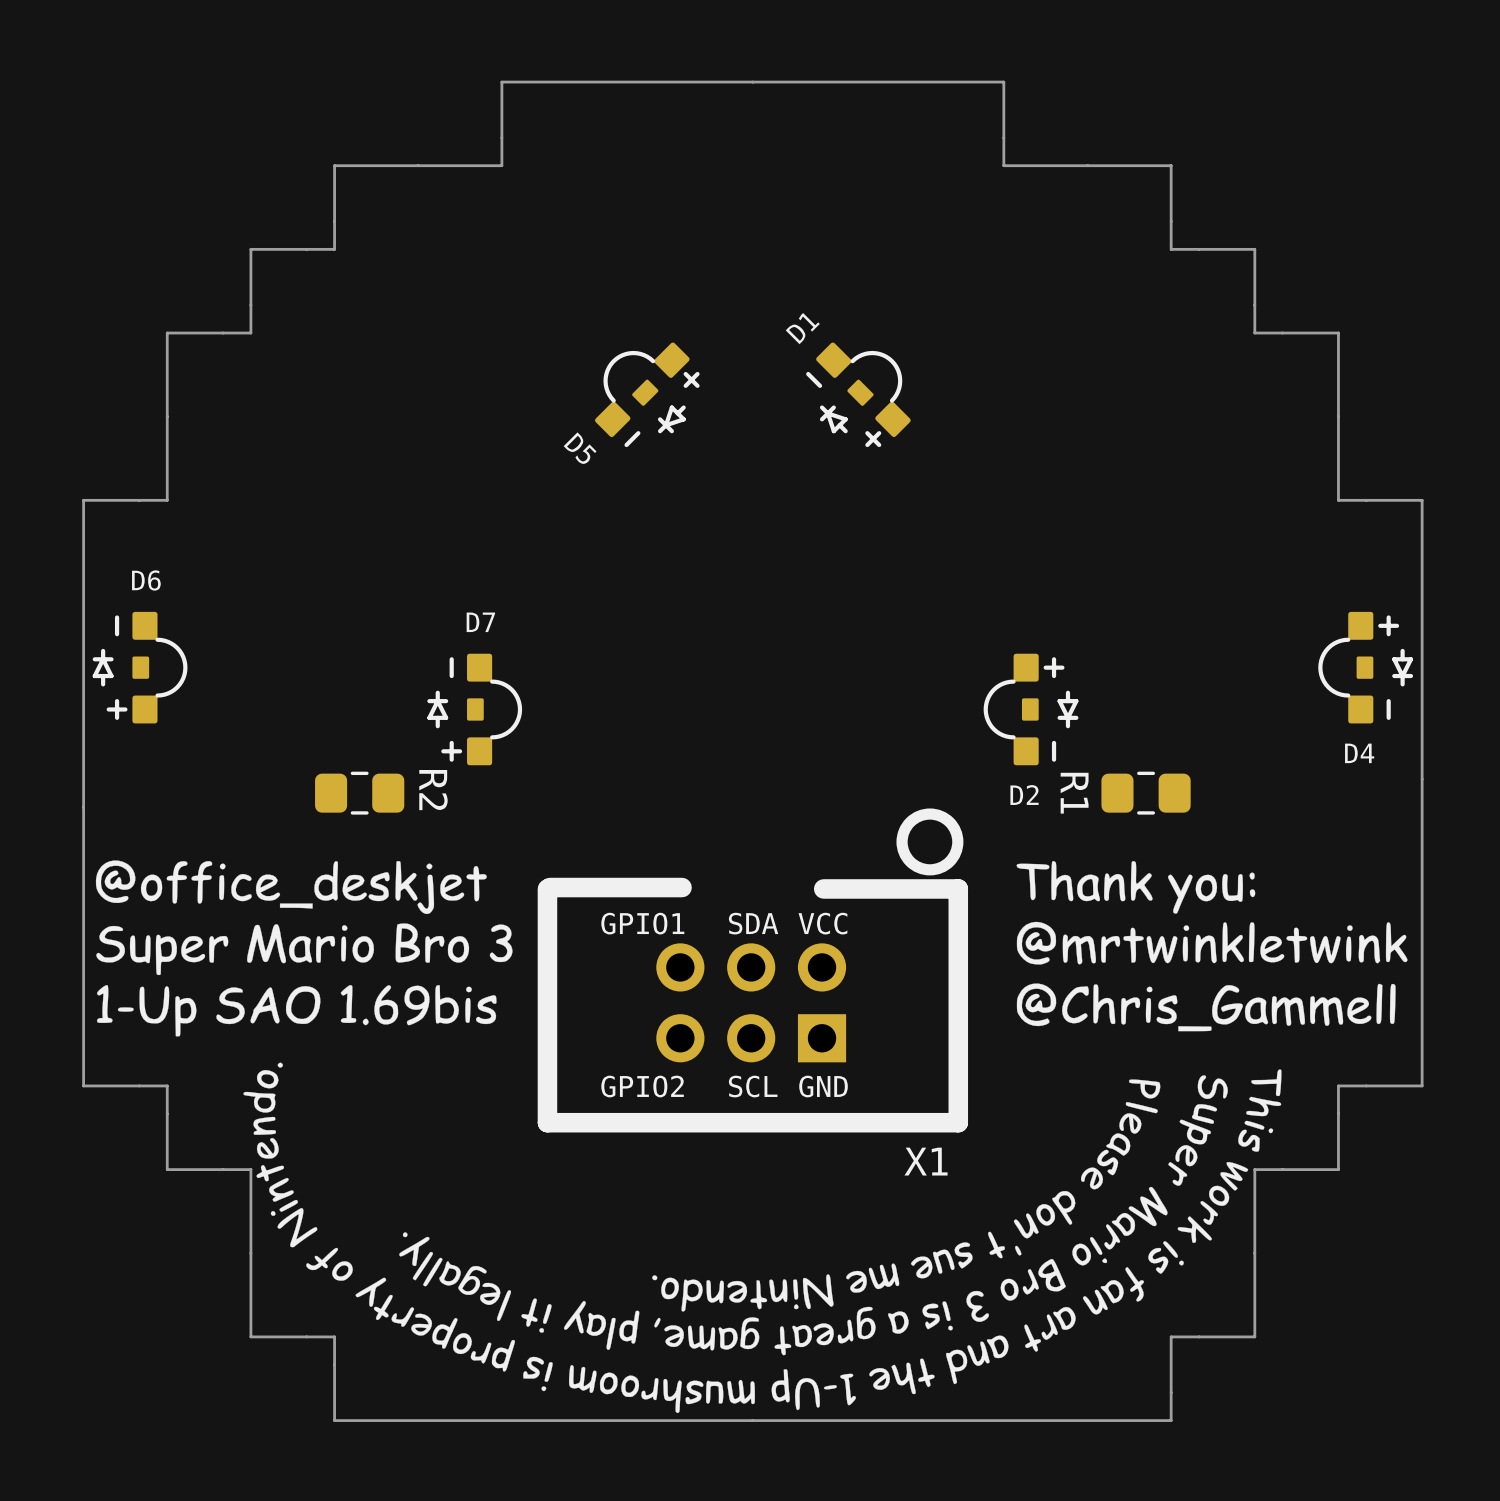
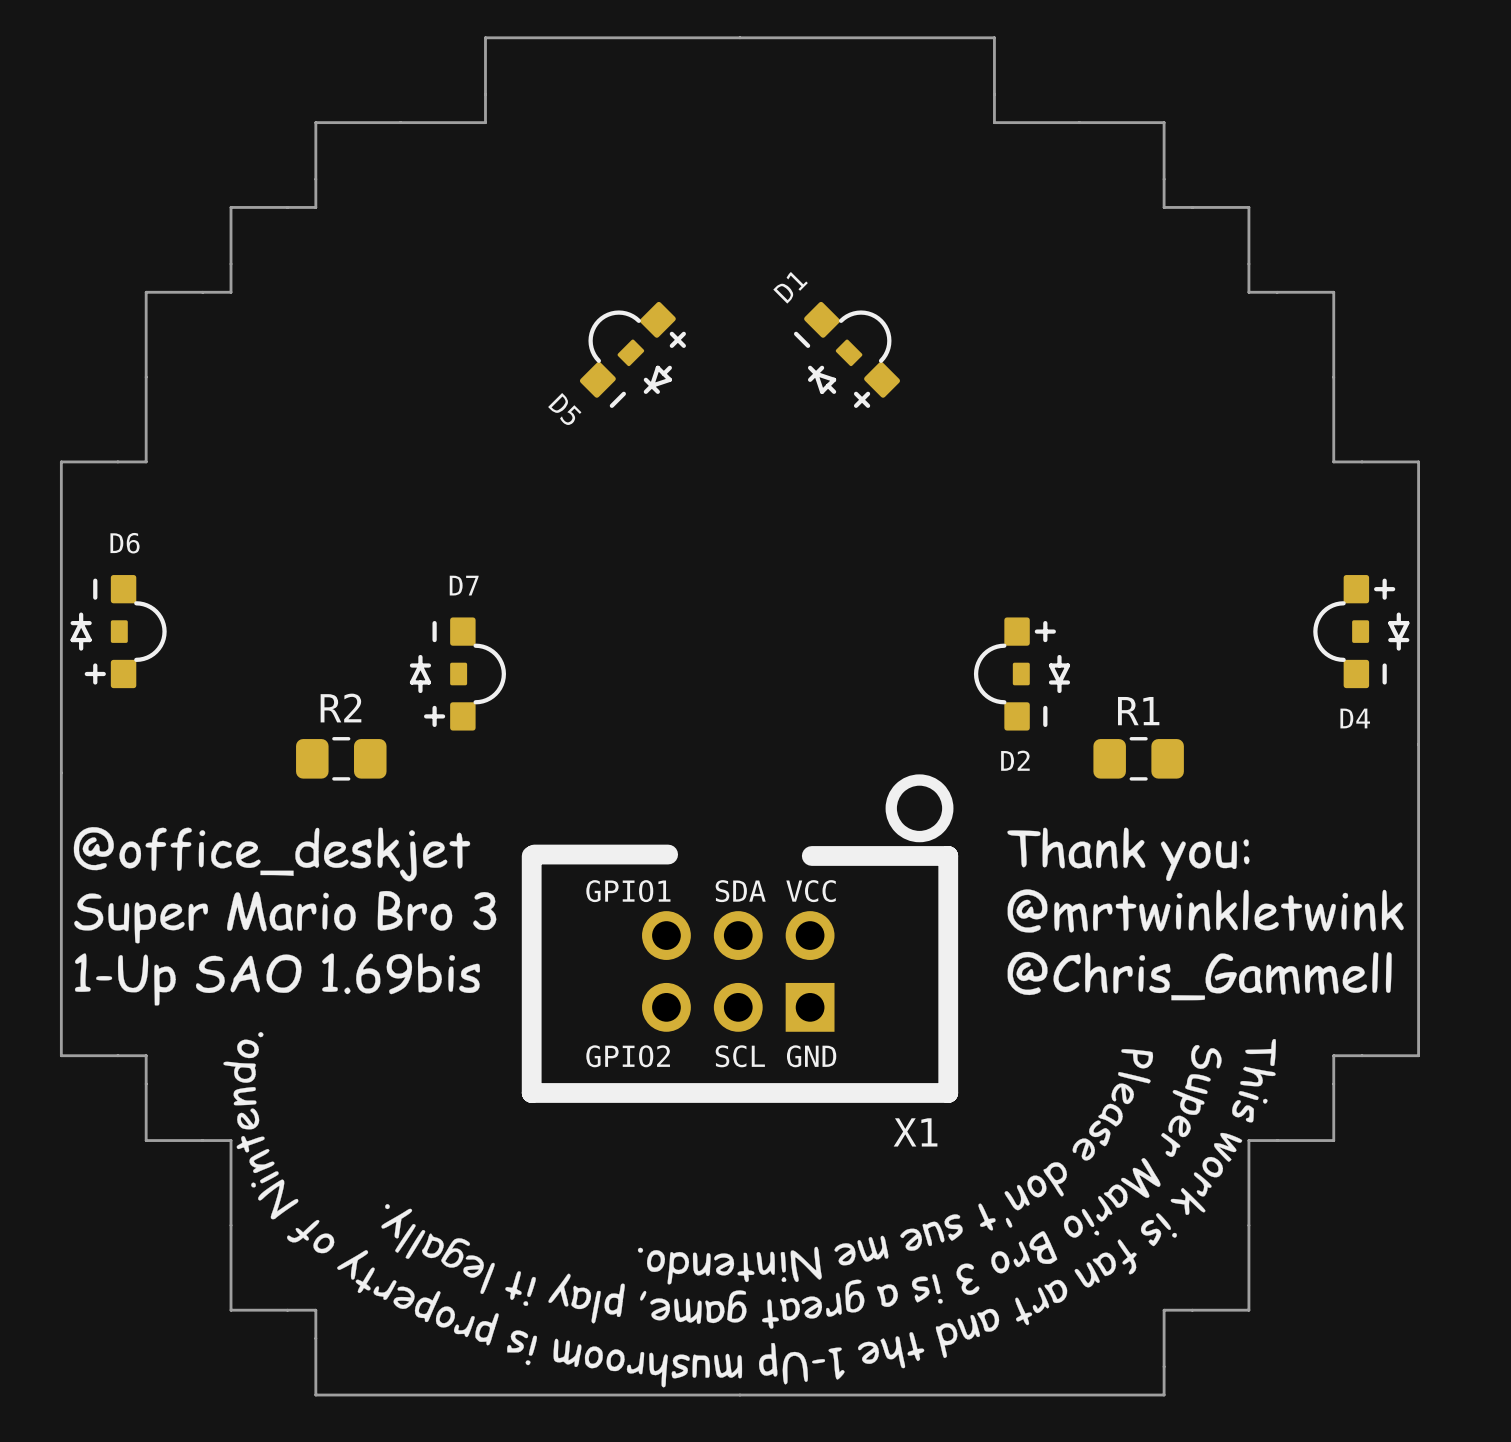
R2 name rotation: 0° (433, 790) -> 90° counterclockwise (340, 708)
R2 name position: R2 (433, 790) -> R2 (340, 708)
R1 name rotation: 0° (1074, 793) -> 90° counterclockwise (1138, 711)
R1 name position: R1 (1074, 793) -> R1 (1138, 711)

